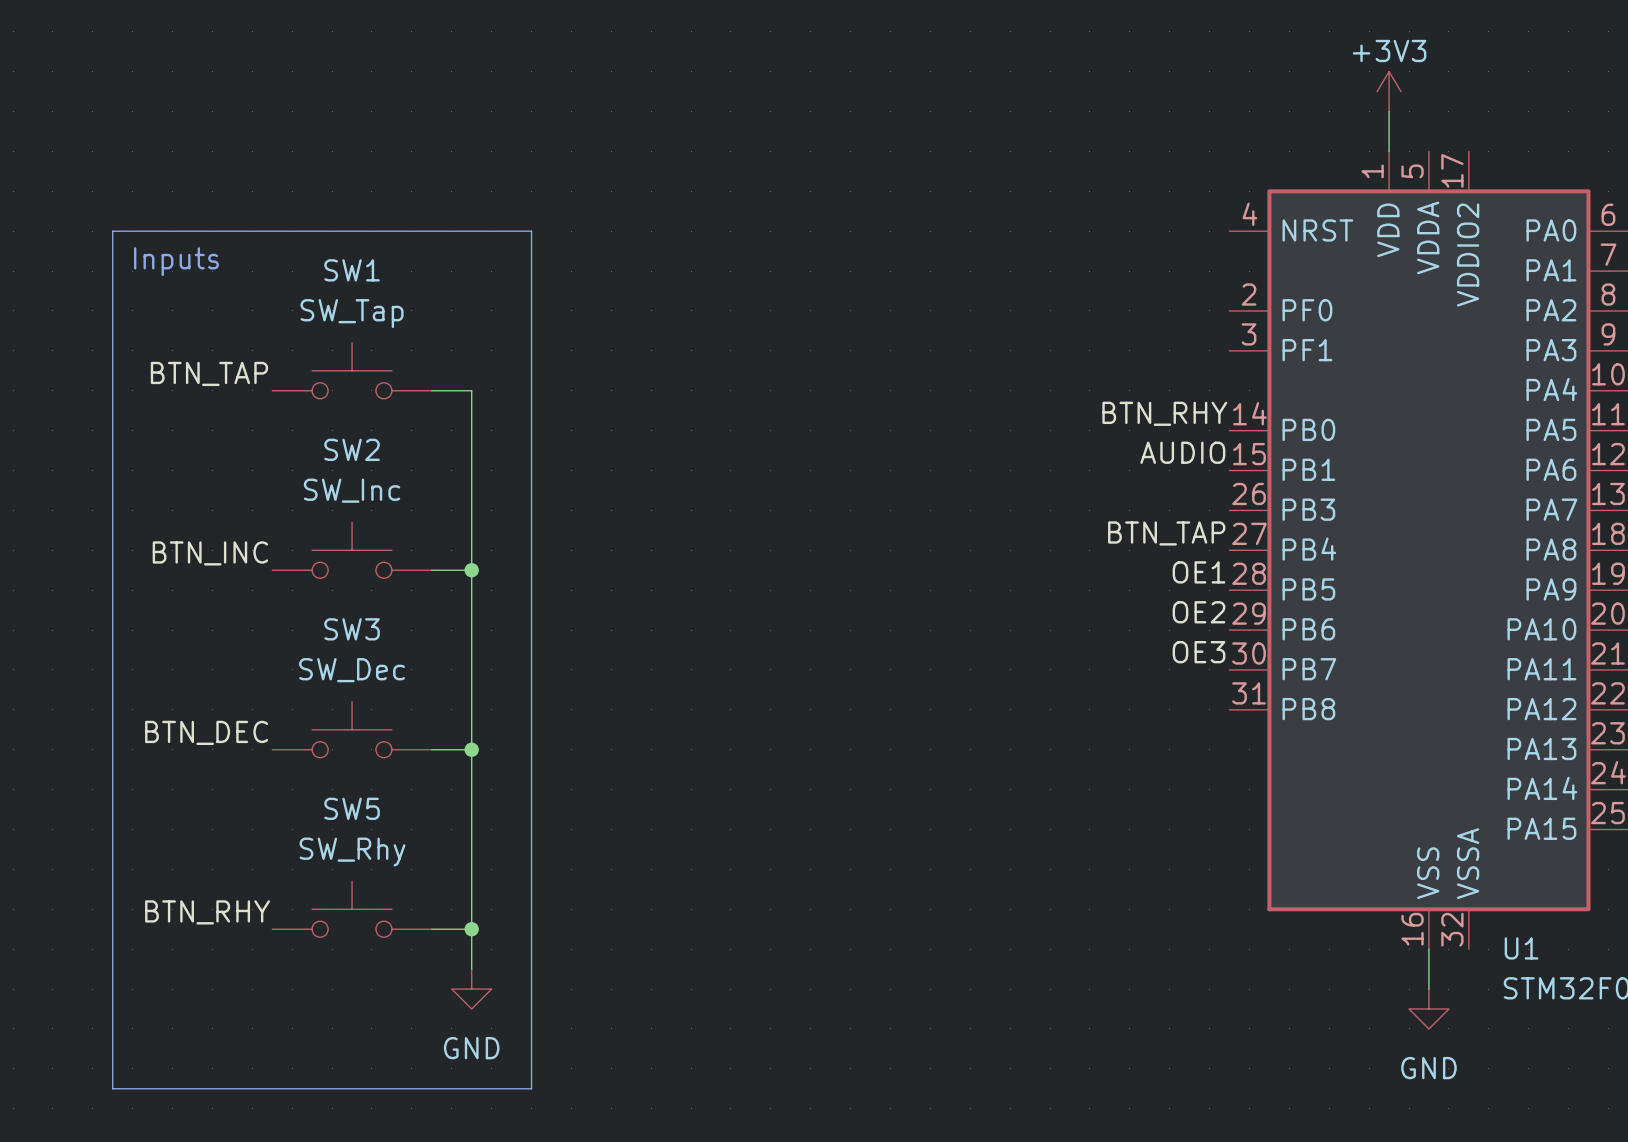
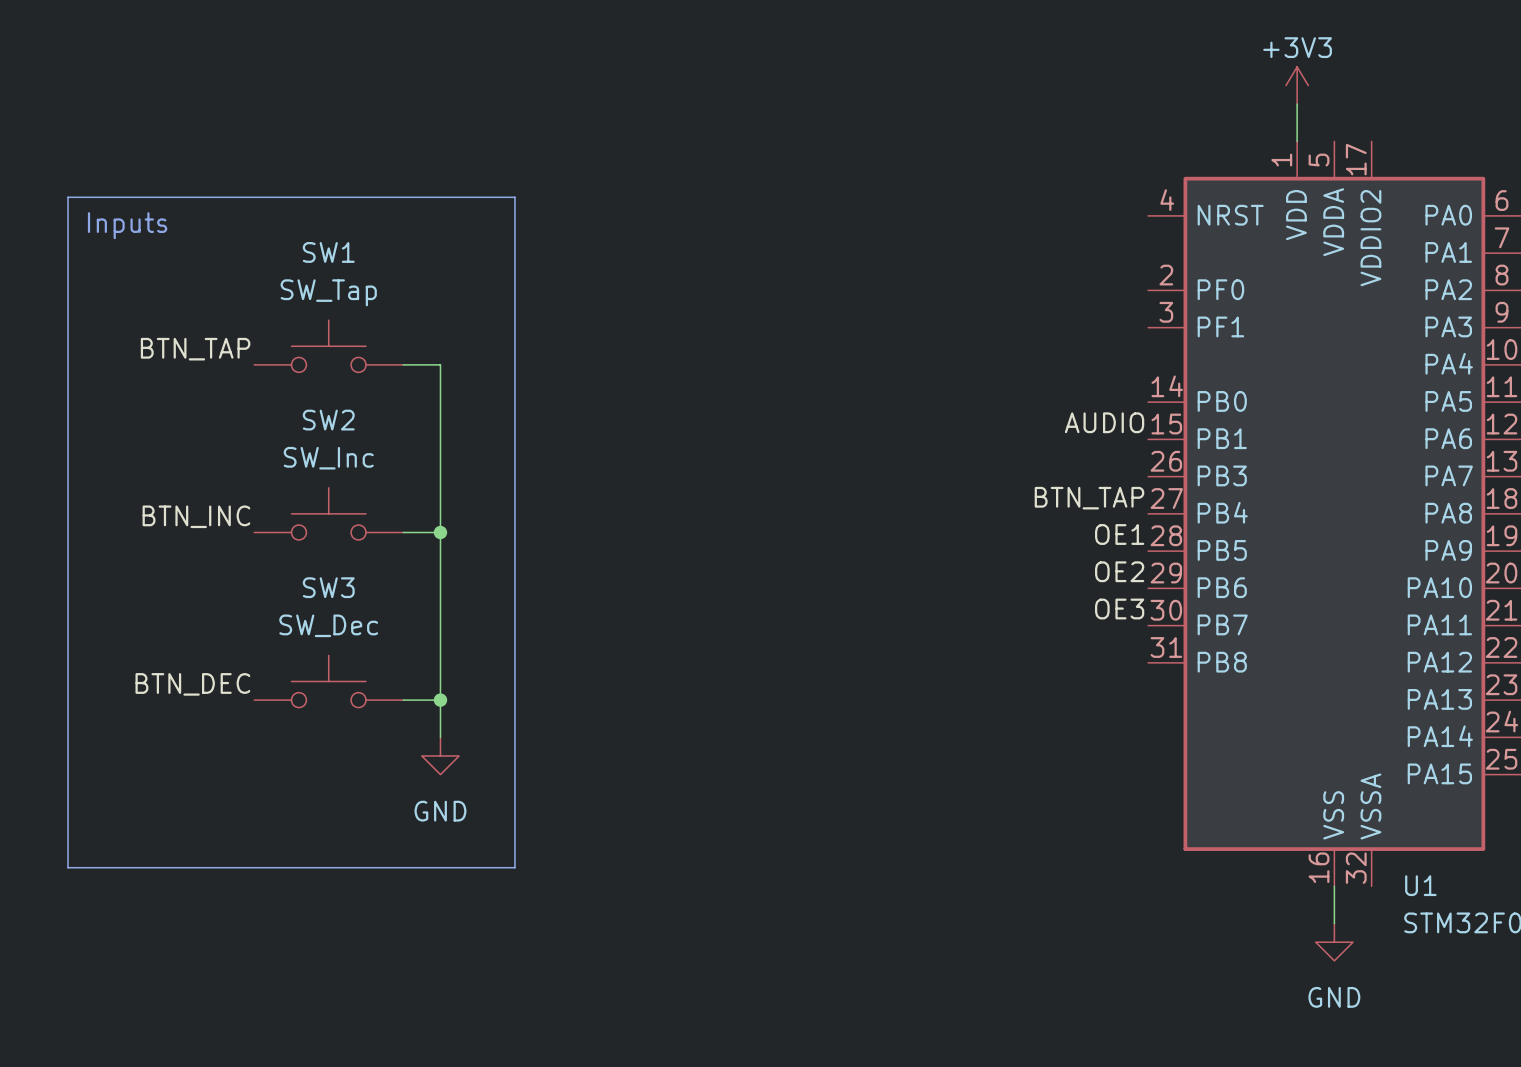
line: (112, 231) (531, 231) (531, 1088) (112, 1088) (112, 231) -> (68, 197) (68, 867) (514, 867) (514, 197) (68, 197)
text position: Inputs (176, 261) -> Inputs (127, 225)
label: BTN_RHY (1164, 413) -> none
wire: (471, 789) (471, 969) -> none
SW5: SW_Rhy (352, 909) -> none
label: BTN_RHY (207, 912) -> none
junction: (471, 929) -> none
power symbol position: GND (471, 989) -> GND (440, 755)

